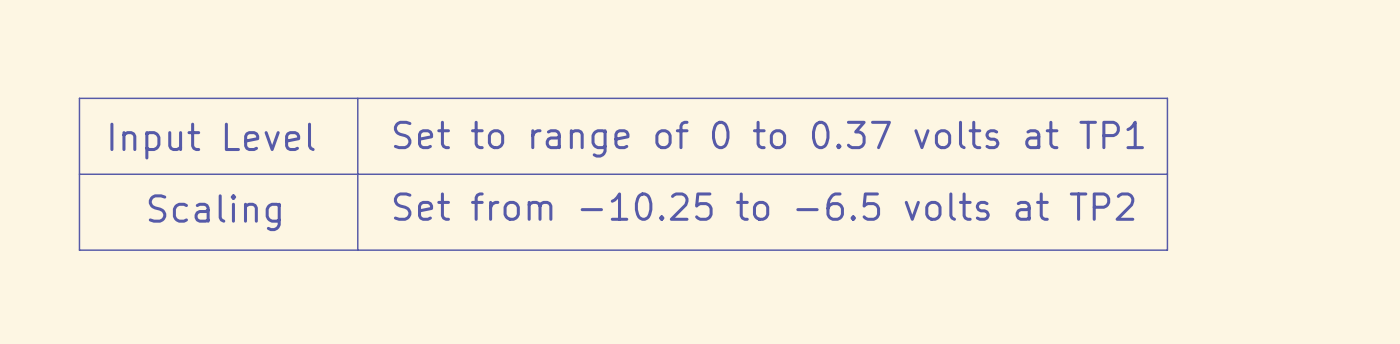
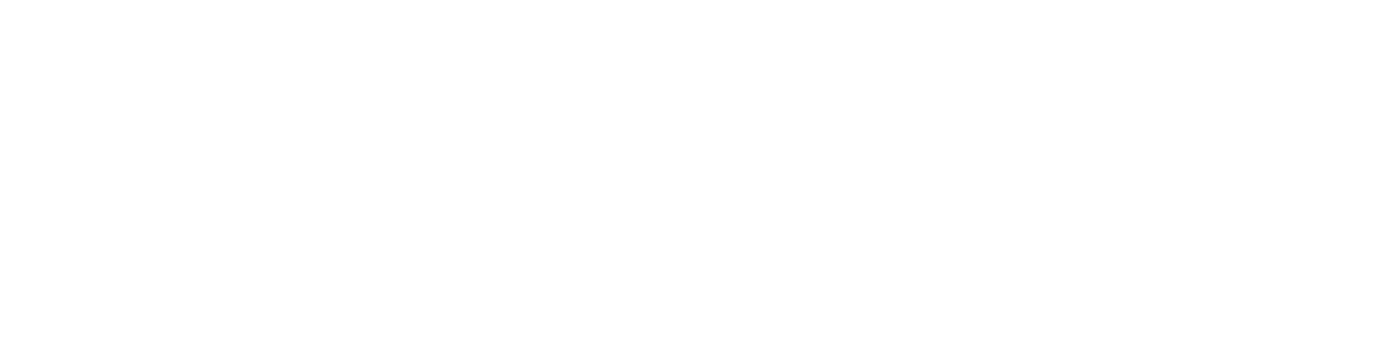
line: (79, 98) (1167, 98) (1167, 250) (79, 250) (79, 98) -> none
line: (357, 98) (357, 250) -> none
text: Set to range of 0 to 0.37 volts at TP1 (768, 139) -> none
text: Input Level (212, 141) -> none
line: (79, 174) (1167, 174) -> none
text: Set from -10.25 to -6.5 volts at TP2 (764, 206) -> none
text: Scaling (214, 212) -> none

